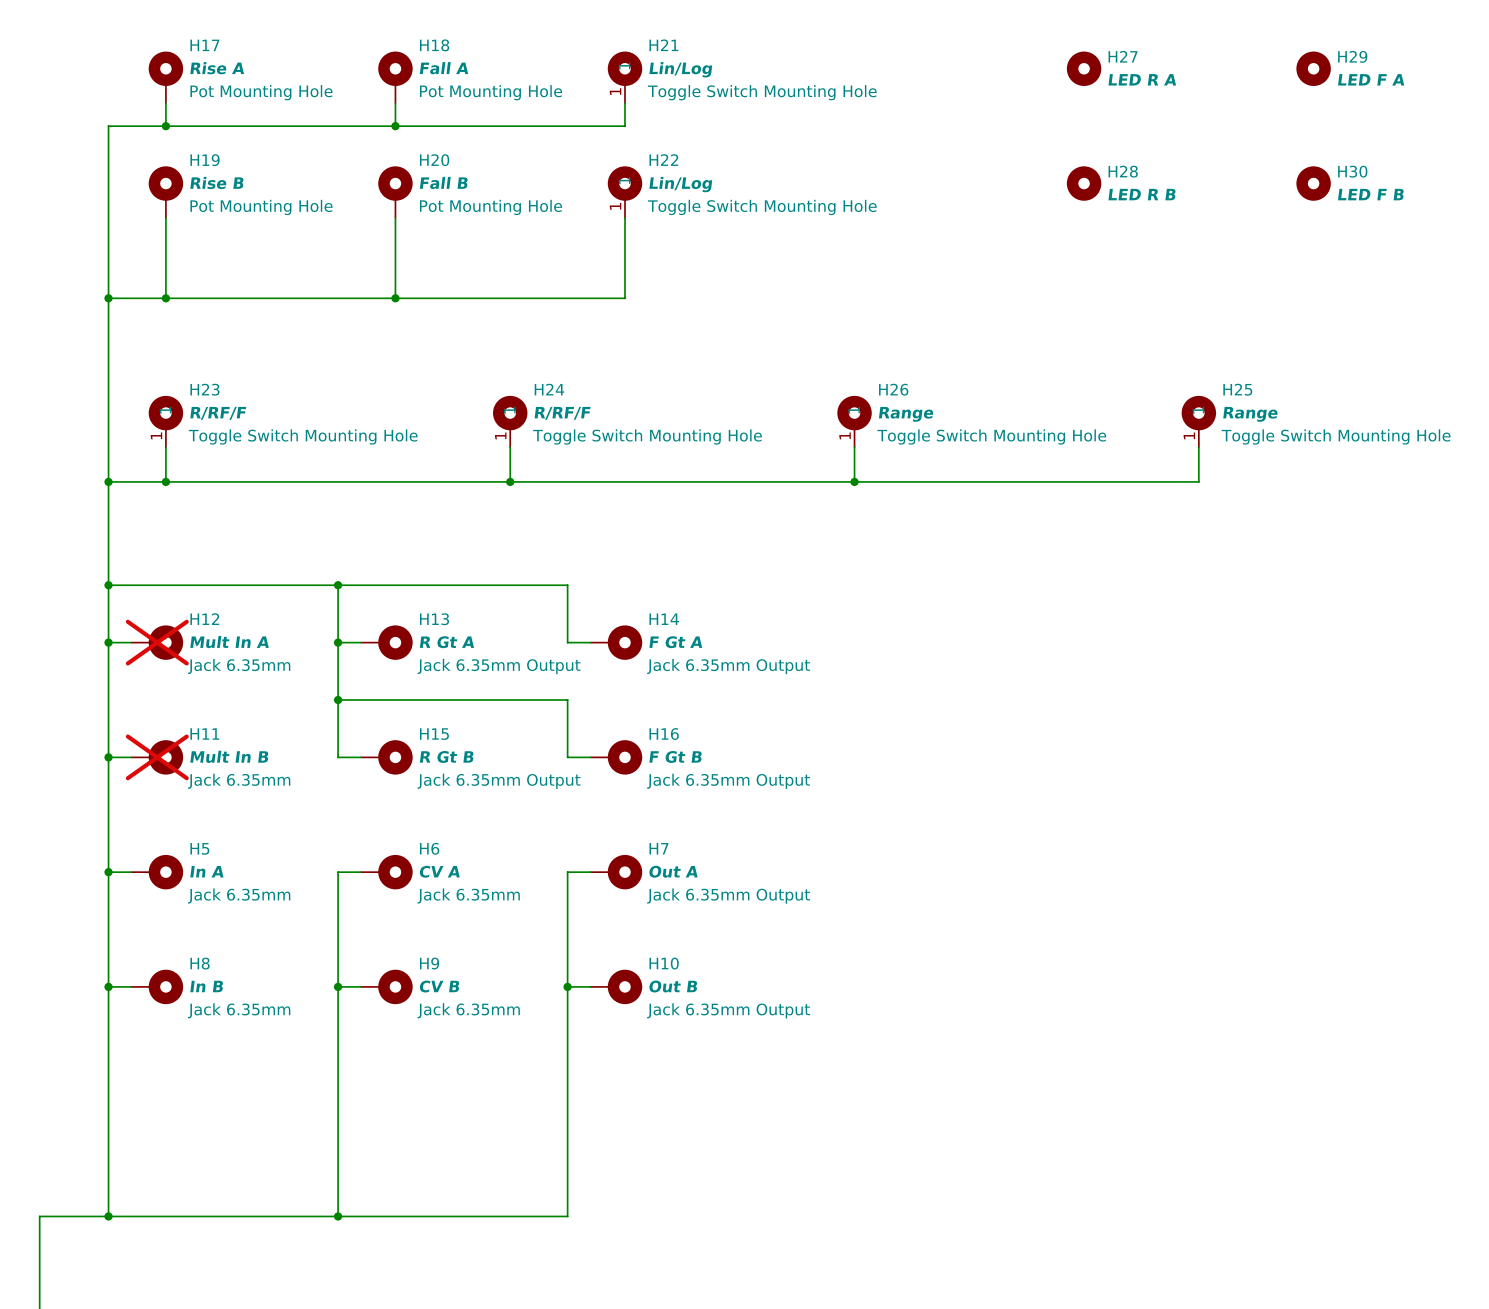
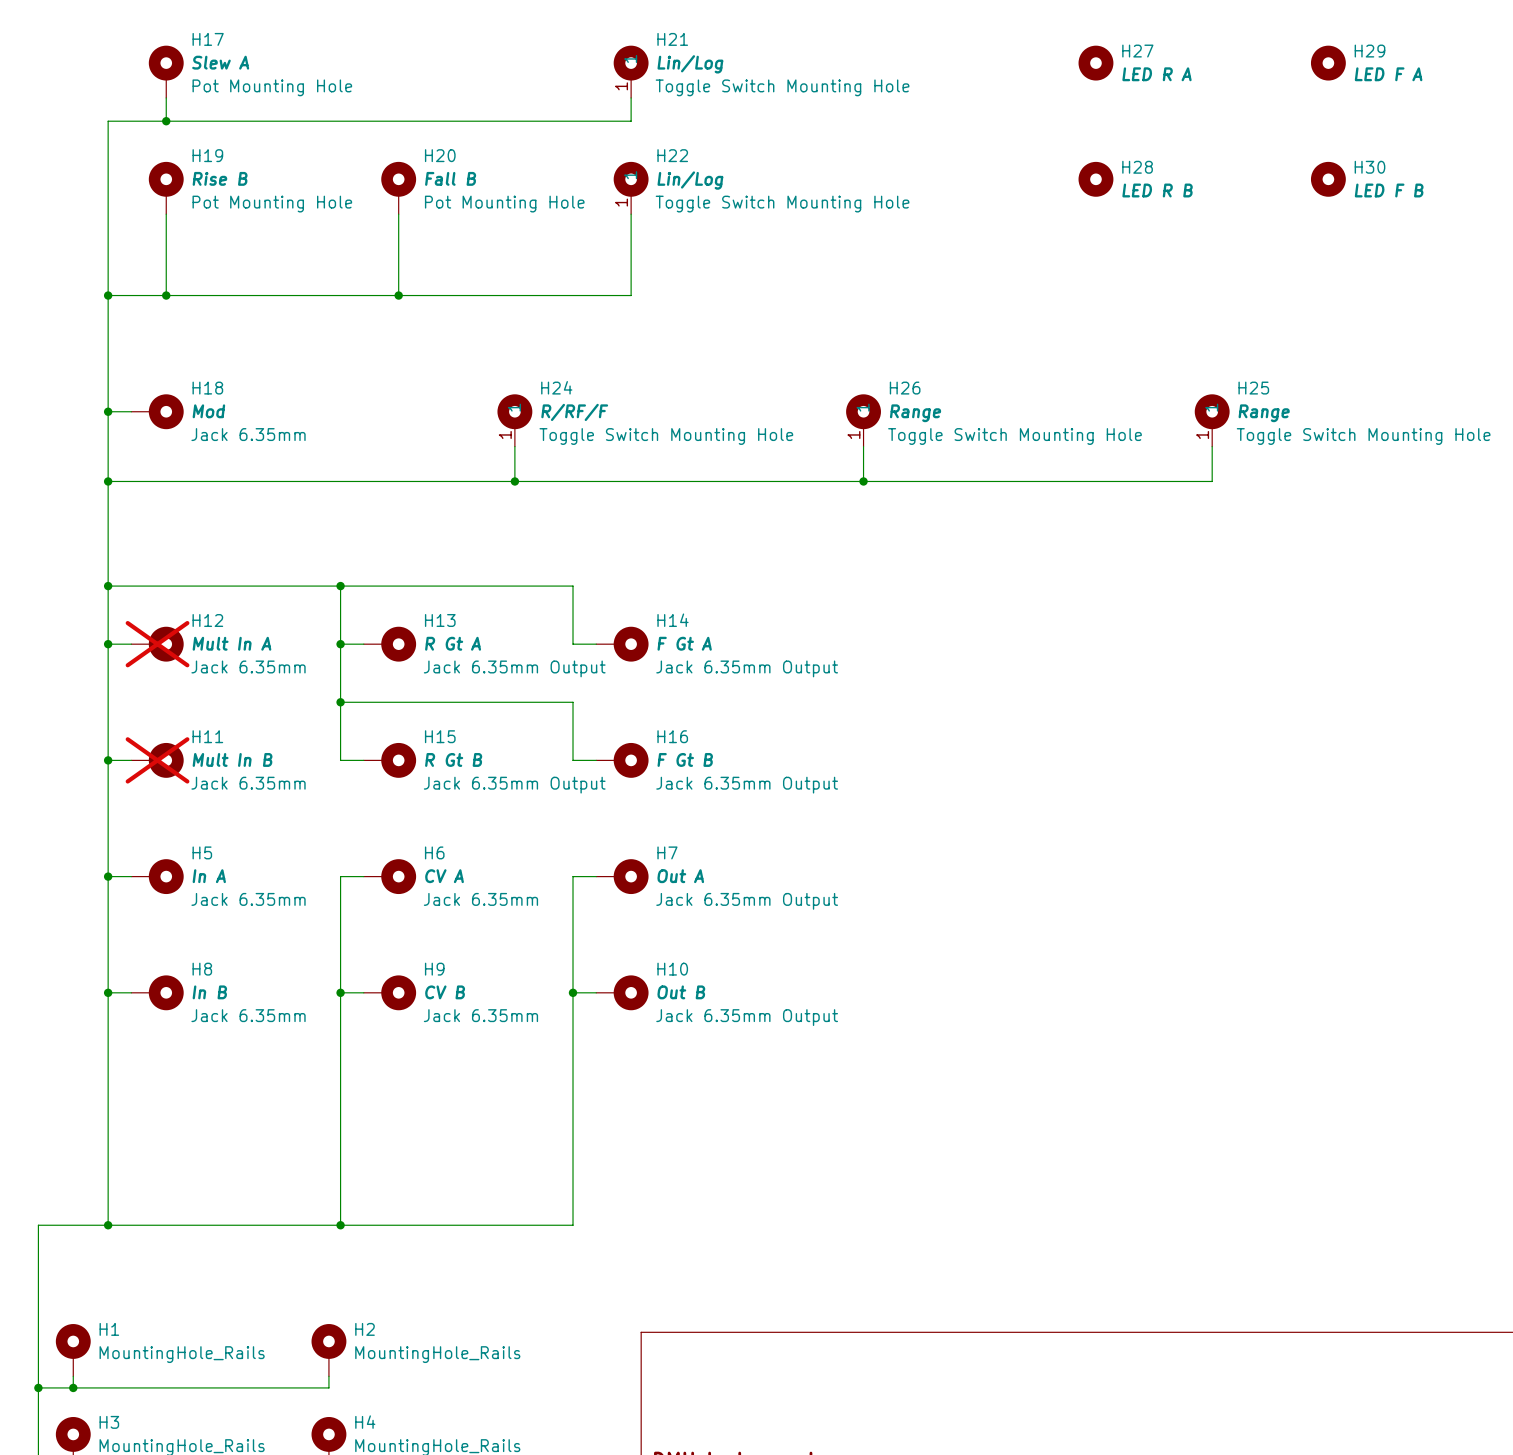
H17 value: Rise A (217, 68) -> Slew A (220, 62)
H18 rotation: 0° (395, 68) -> 90° clockwise (166, 411)
H18 value: Fall A (444, 68) -> Mod (208, 411)
H18 position: (395, 77) -> (157, 411)
H18 text: Pot Mounting Hole (491, 92) -> Jack 6.35mm (248, 434)
wire: (395, 103) (395, 126) -> none
junction: (395, 126) -> none
wire: none -> (108, 411) (131, 411)
junction: none -> (108, 411)
H23: R/RF/F (165, 421) -> none
wire: (165, 447) (165, 481) -> none
junction: (165, 481) -> none

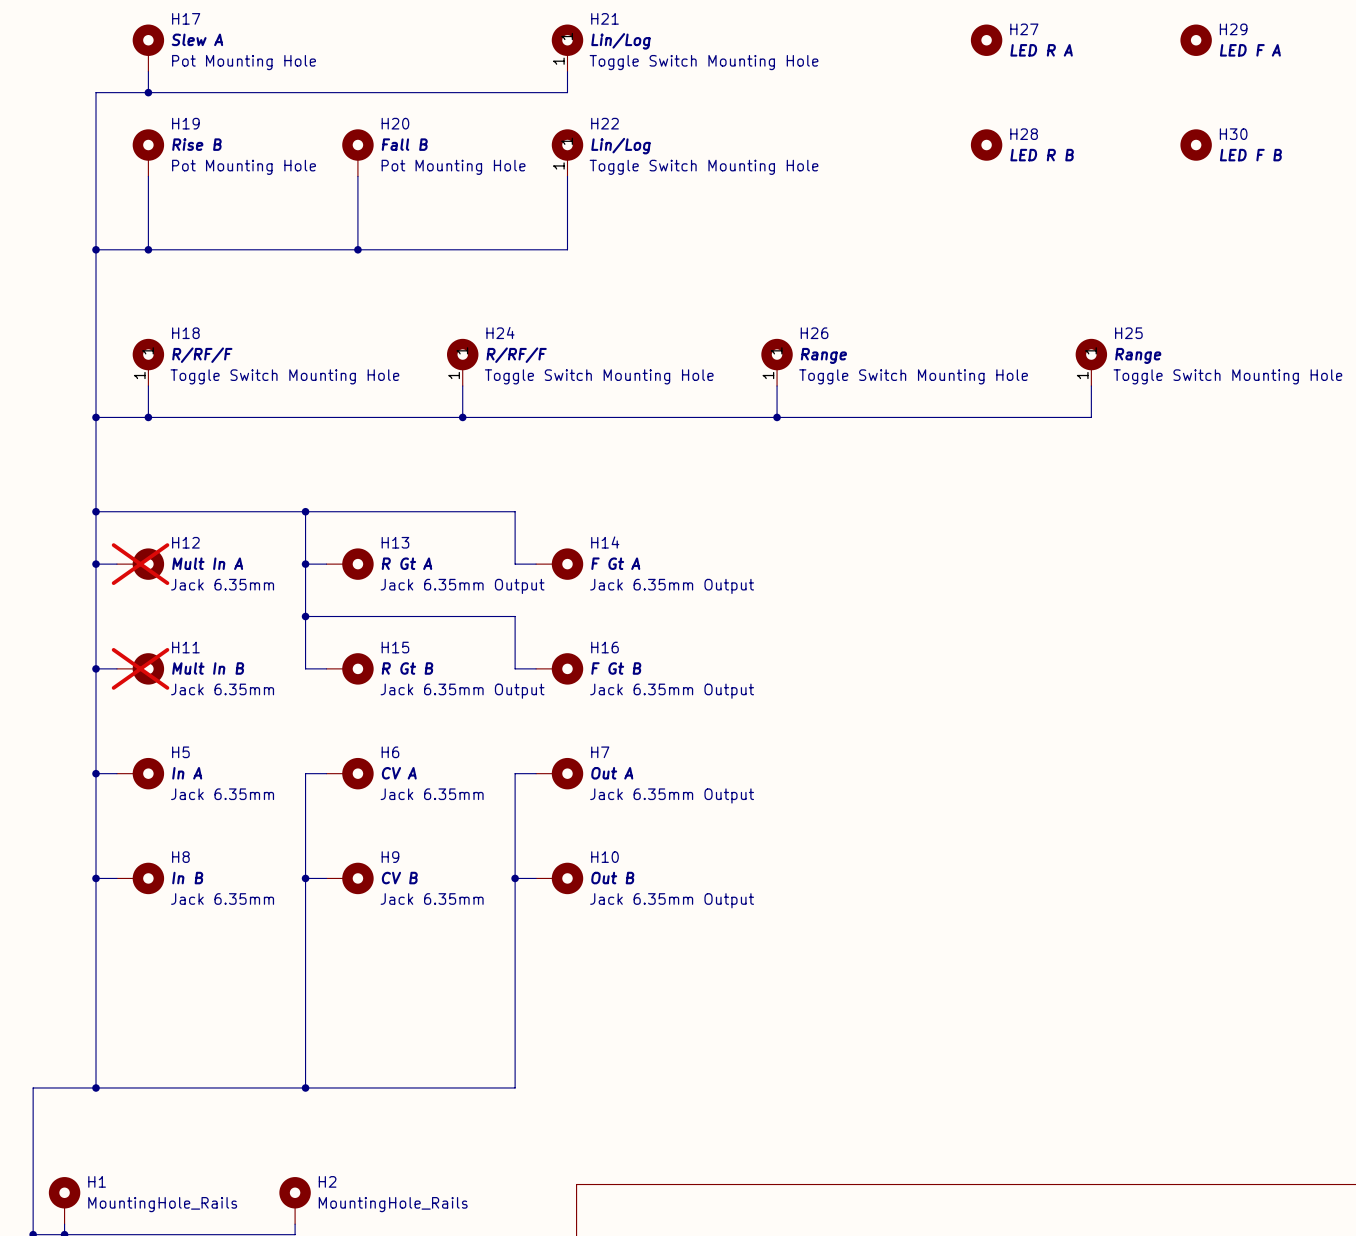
H18 symbol: [131, 394, 184, 430] -> [132, 338, 165, 387]
wire: (108, 411) (131, 411) -> none
junction: (108, 411) -> none
H18 value: Mod (208, 411) -> R/RF/F (202, 355)
H18 text: Jack 6.35mm (248, 434) -> Toggle Switch Mounting Hole (284, 376)
wire: none -> (148, 386) (148, 417)
junction: none -> (148, 417)

